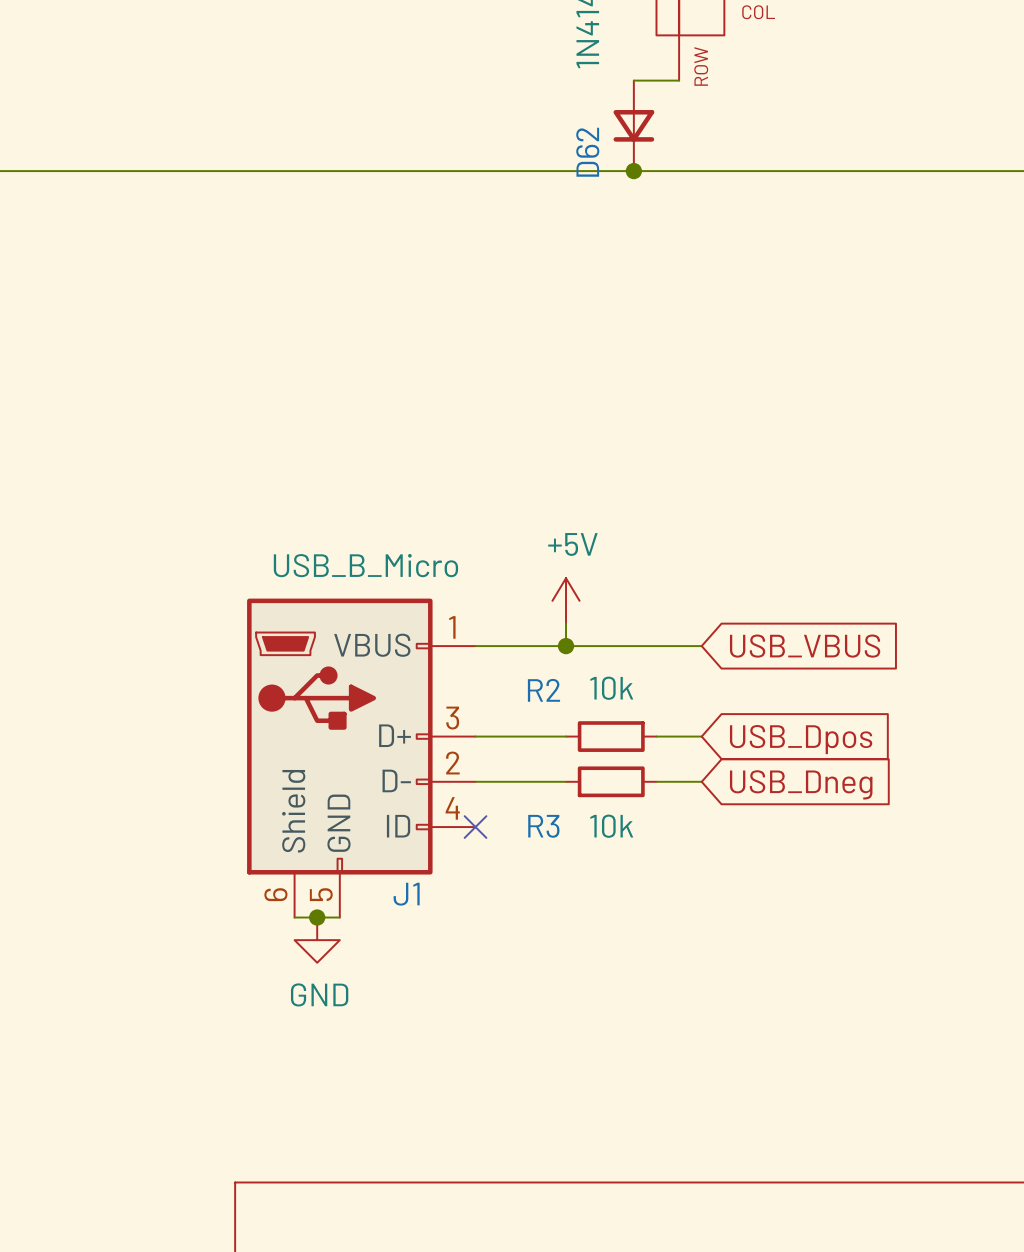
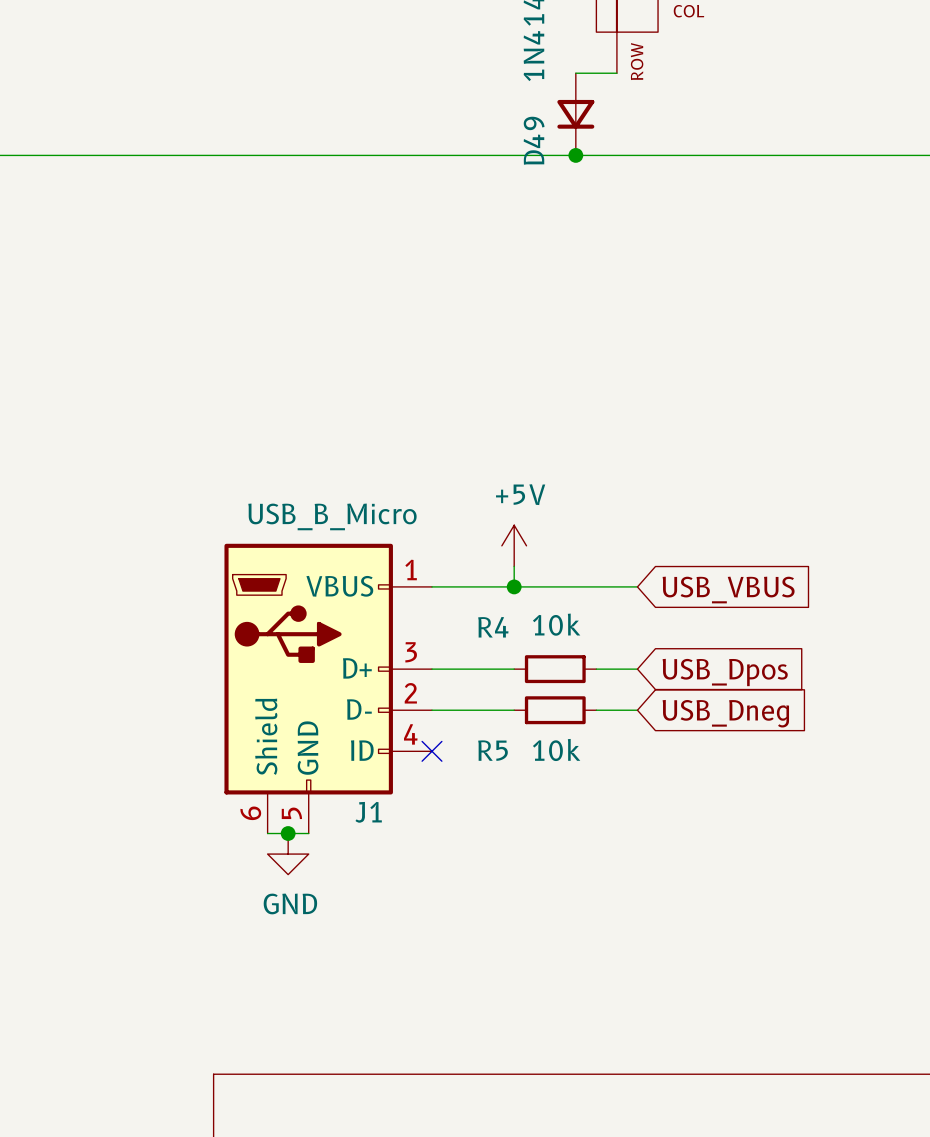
D62 name: D62 (587, 152) -> D49 (534, 140)
R2 name: R2 (543, 690) -> R4 (493, 627)
R3 name: R3 (543, 826) -> R5 (492, 750)

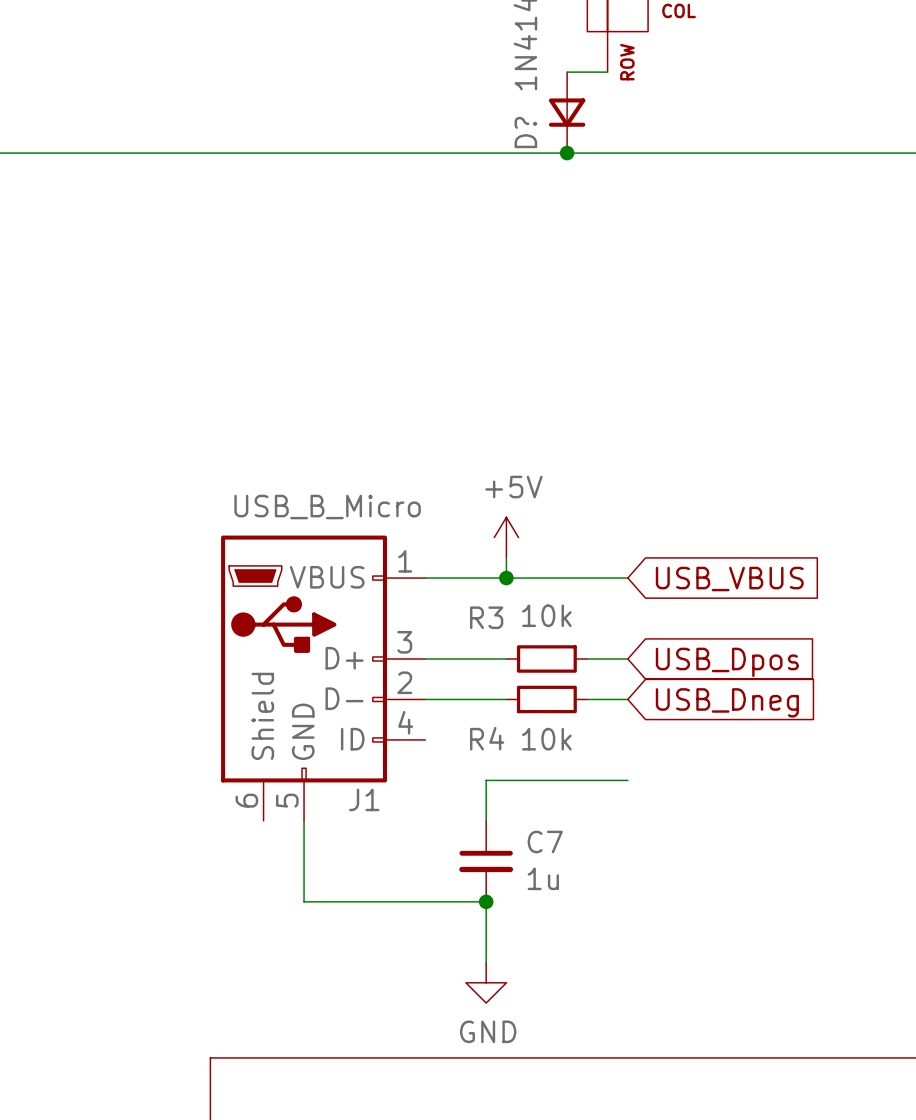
D49 name: D49 (534, 140) -> D? (525, 132)
R4 name: R4 (493, 627) -> R3 (486, 617)
R5 name: R5 (492, 750) -> R4 (487, 738)
no-connect mark: (431, 751) -> none
wire: none -> (627, 780) (486, 780) (486, 820)
wire: (267, 833) (308, 833) -> (486, 962) (486, 901) (304, 901) (304, 820)
junction: (288, 833) -> none
power symbol position: GND (288, 854) -> GND (486, 982)
C7: none -> 1u (486, 861)
junction: none -> (486, 901)

